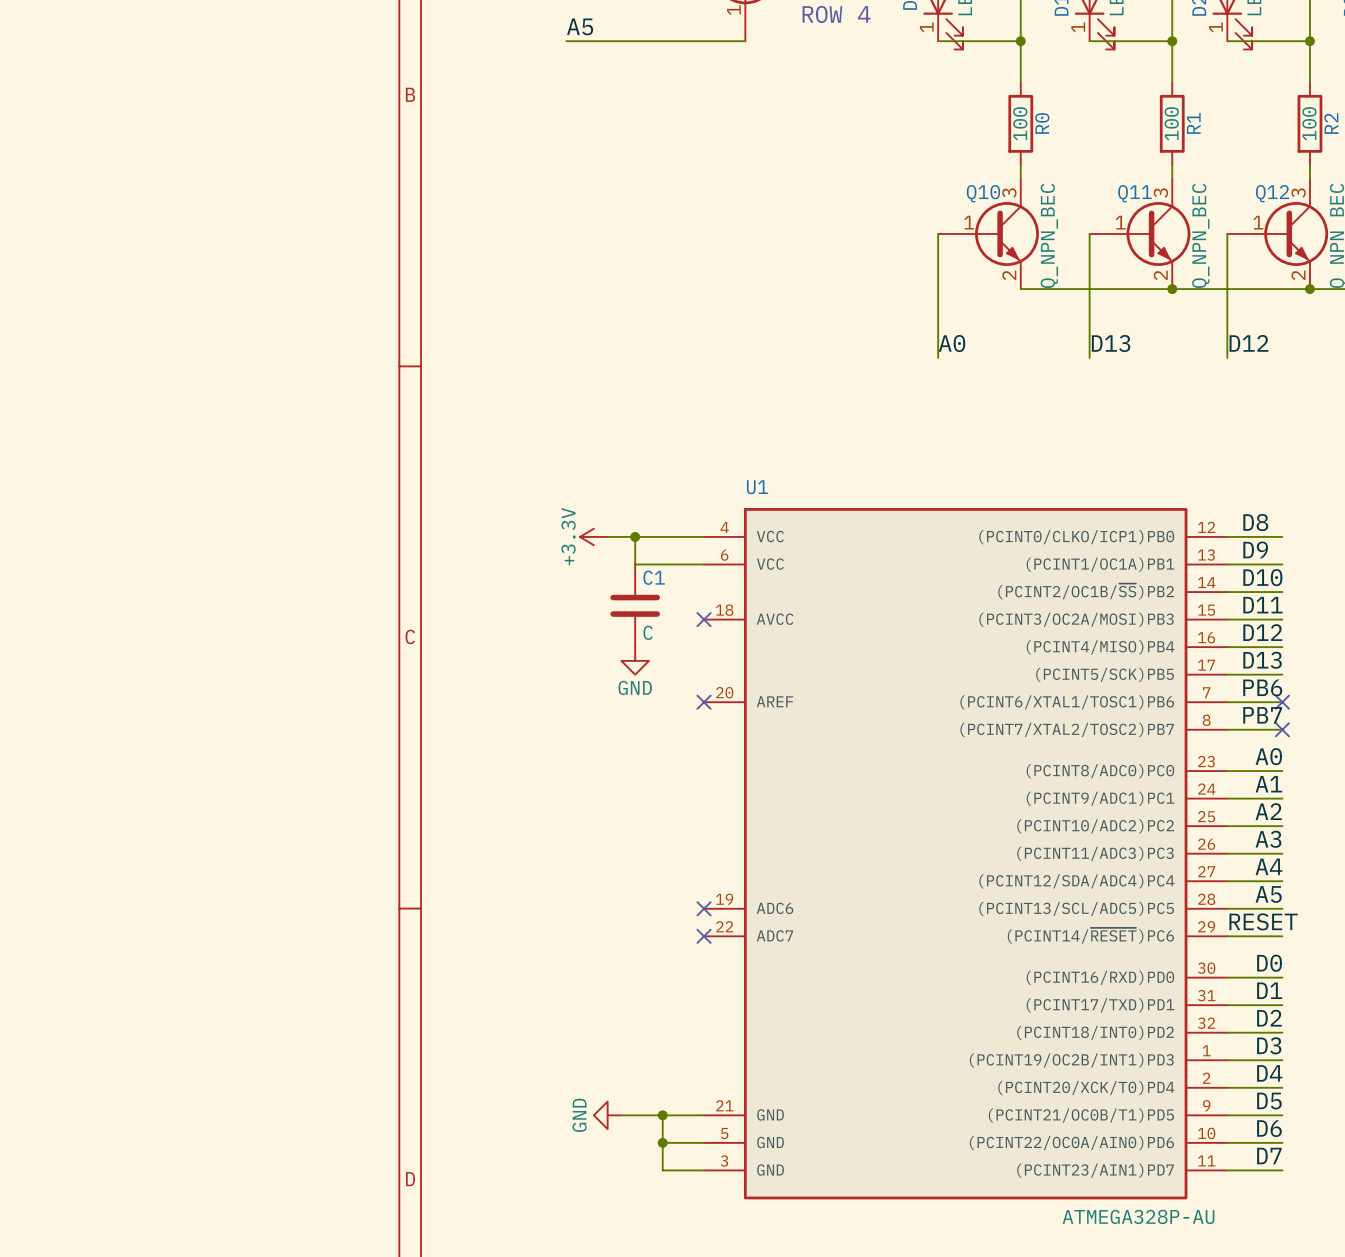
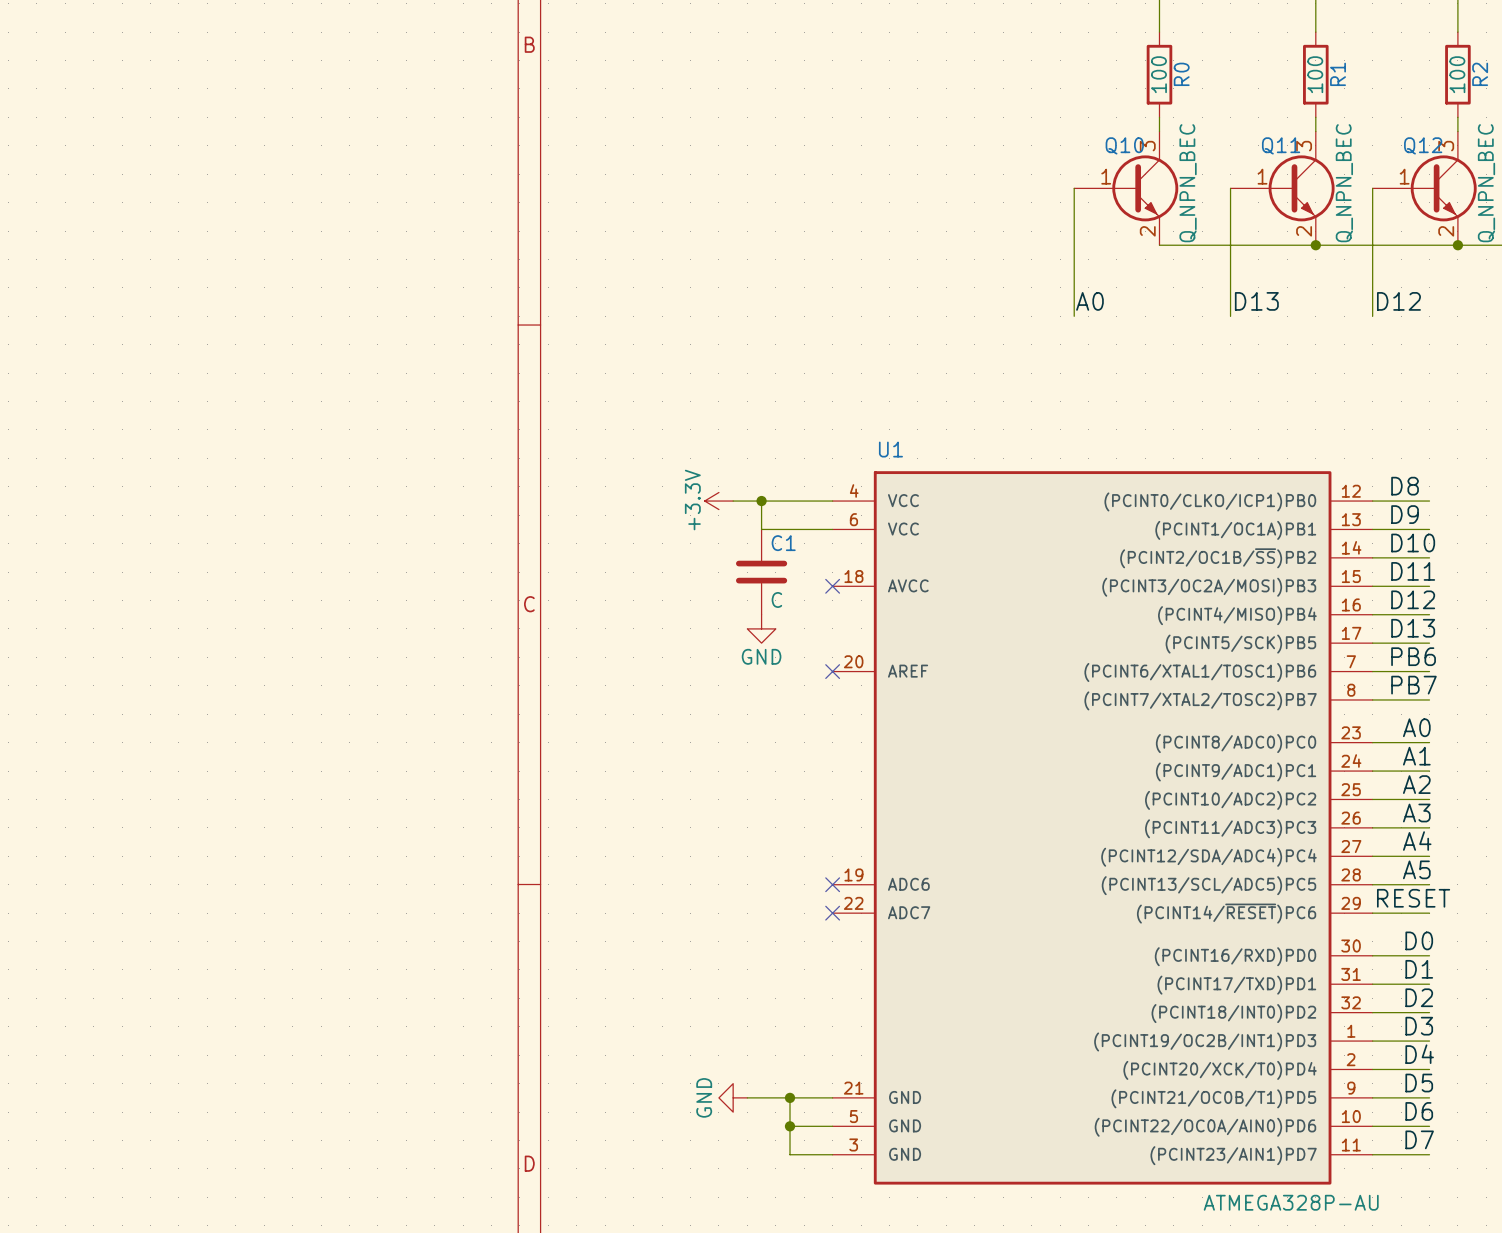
no-connect mark: (1282, 702) -> none
no-connect mark: (1282, 729) -> none

